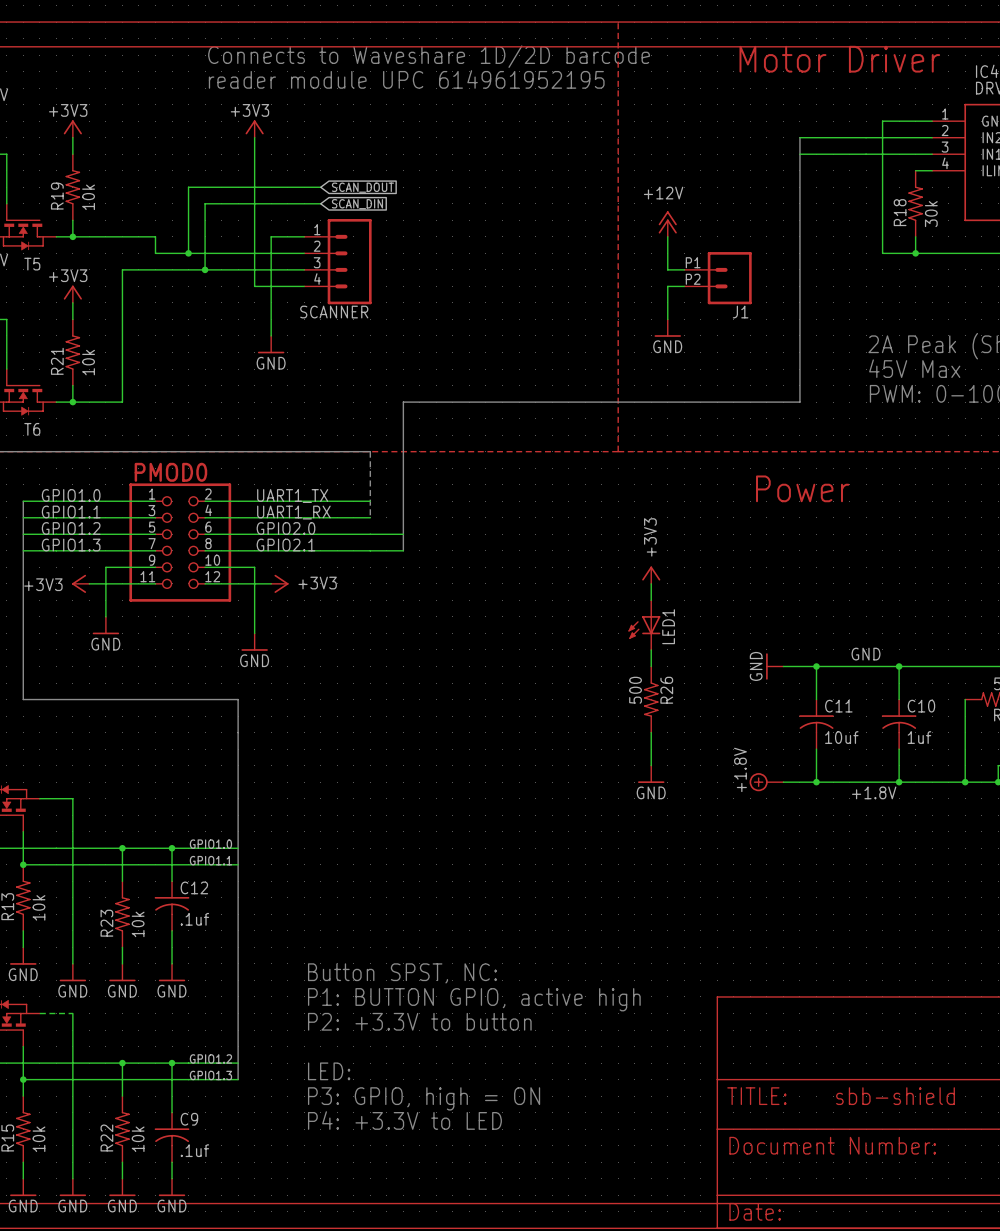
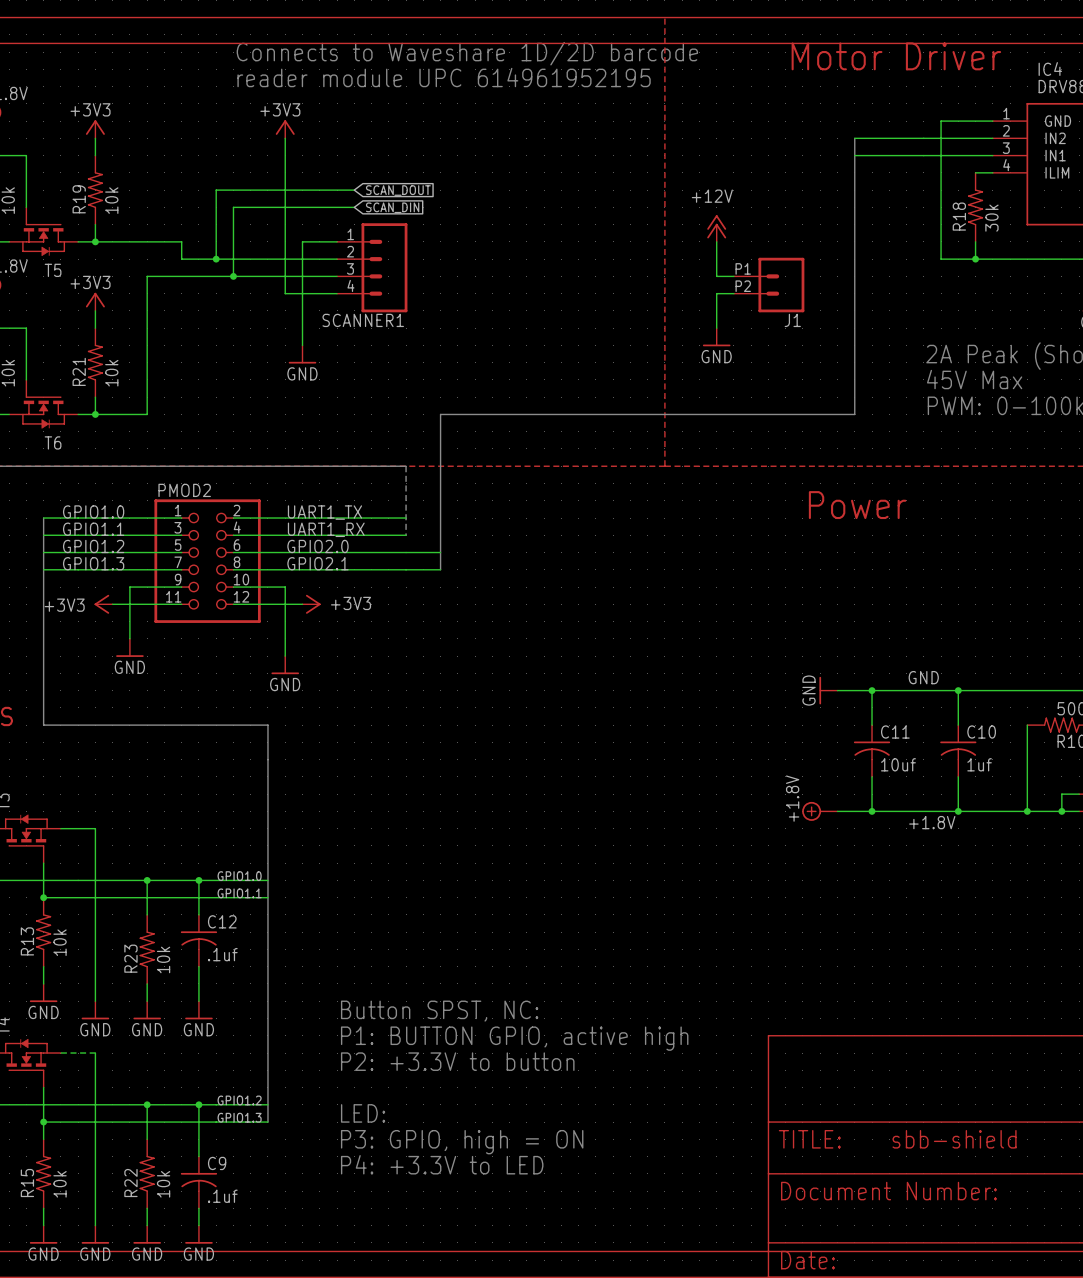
SCANNER name: SCANNER (334, 312) -> SCANNER1 (363, 320)
PMOD0 name: PMOD0 (170, 472) -> PMOD2 (184, 490)
power symbol: +3V3 (651, 575) -> none
wire: (651, 583) (651, 600) -> none
LED1: (644, 625) -> none
wire: (651, 649) (651, 666) -> none
R26: 500 (651, 699) -> none
wire: (651, 732) (651, 765) -> none
power symbol: GND (651, 774) -> none

